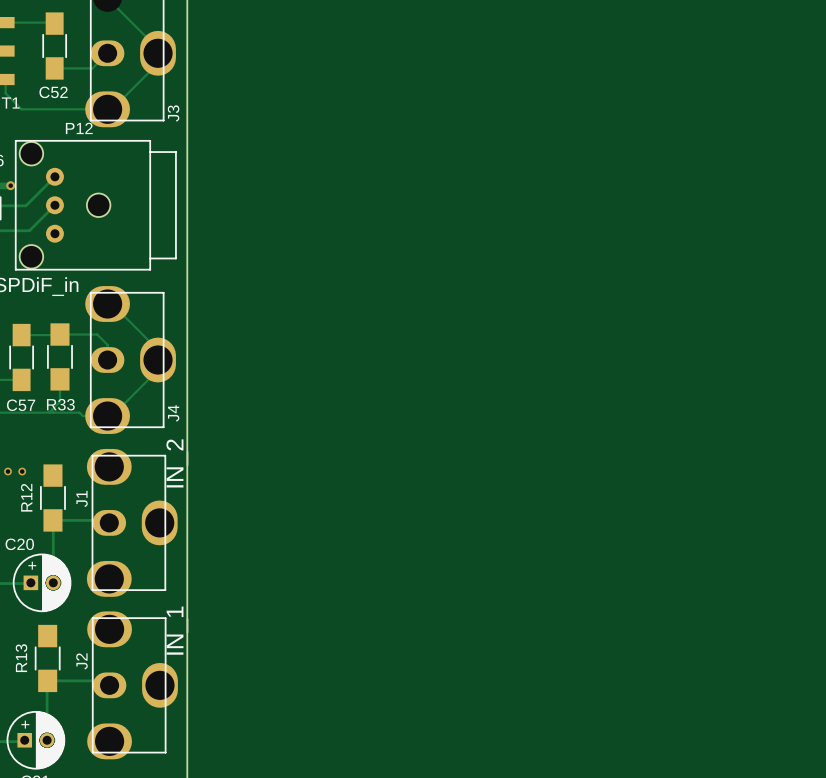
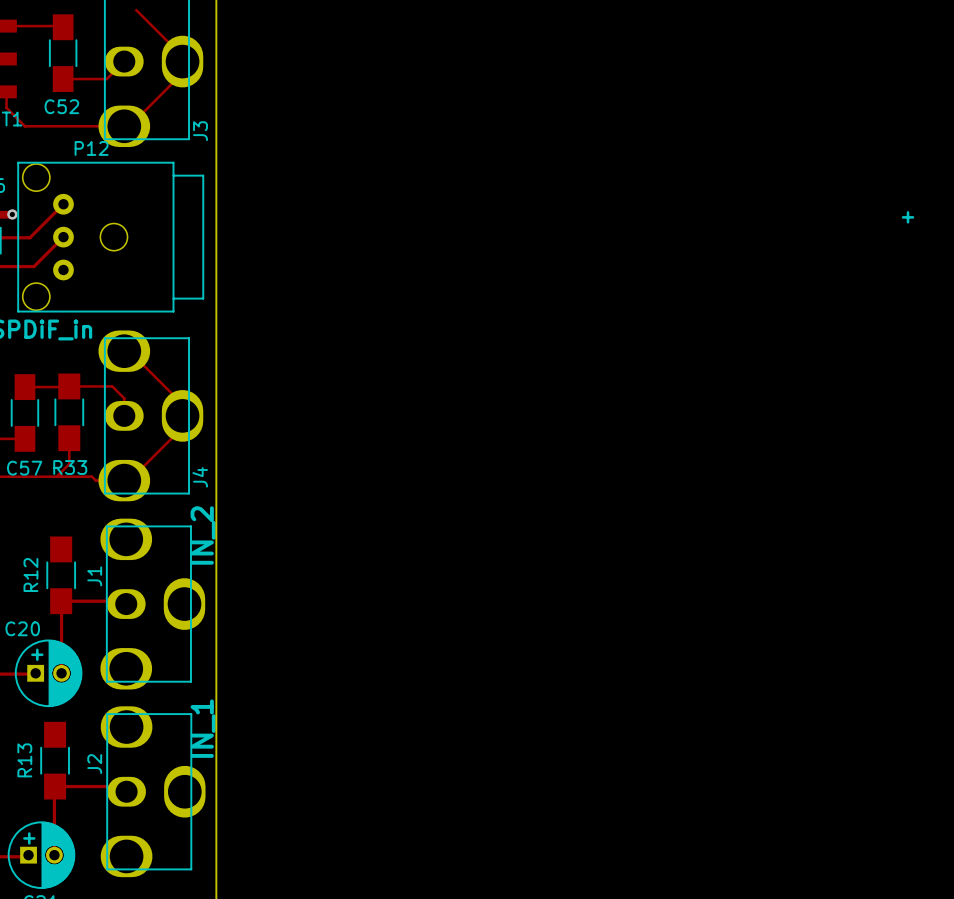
text: none -> + (908, 217)
via: (8, 471) -> none
via: (22, 471) -> none

